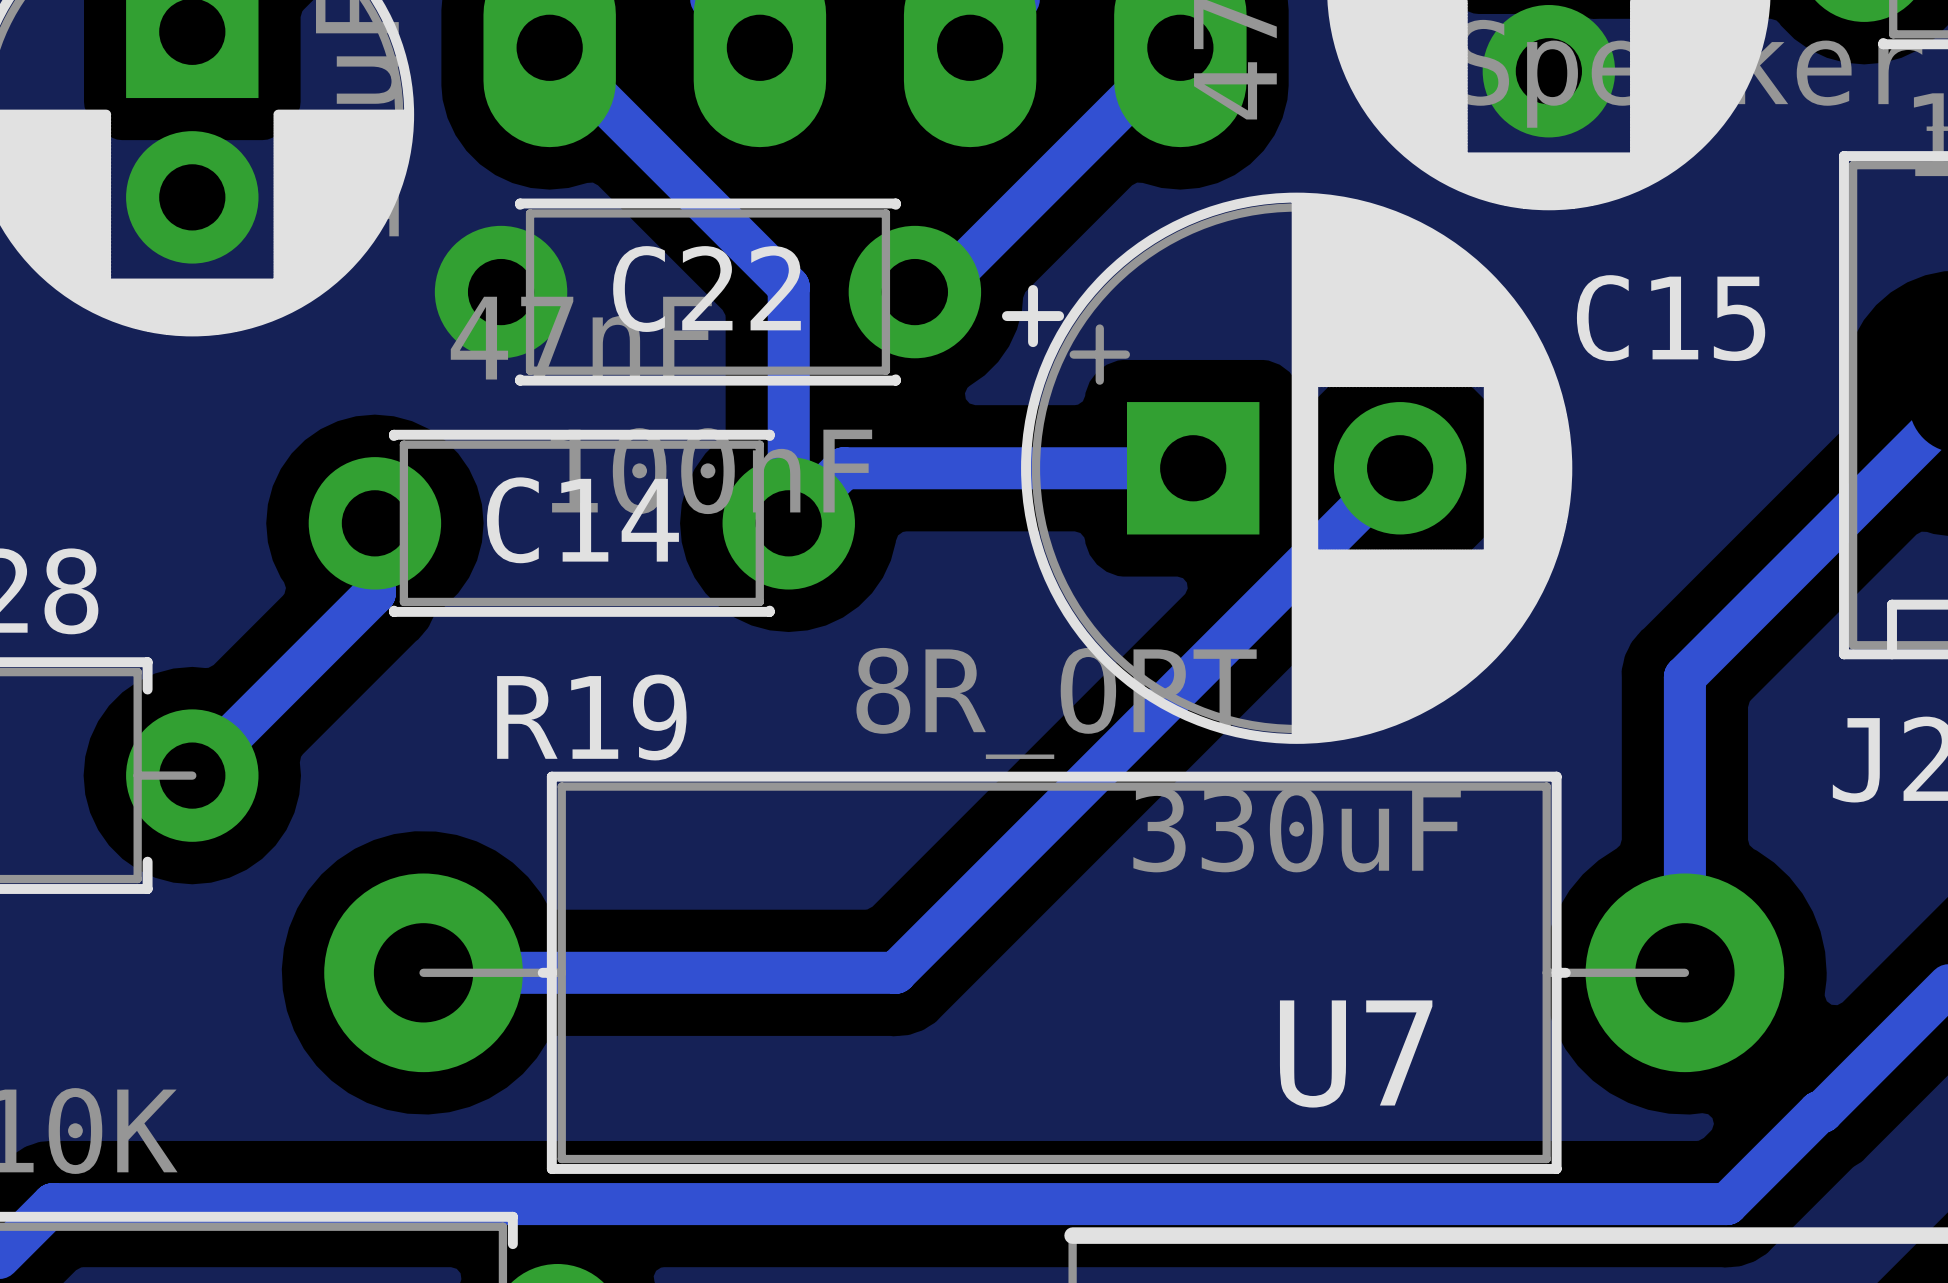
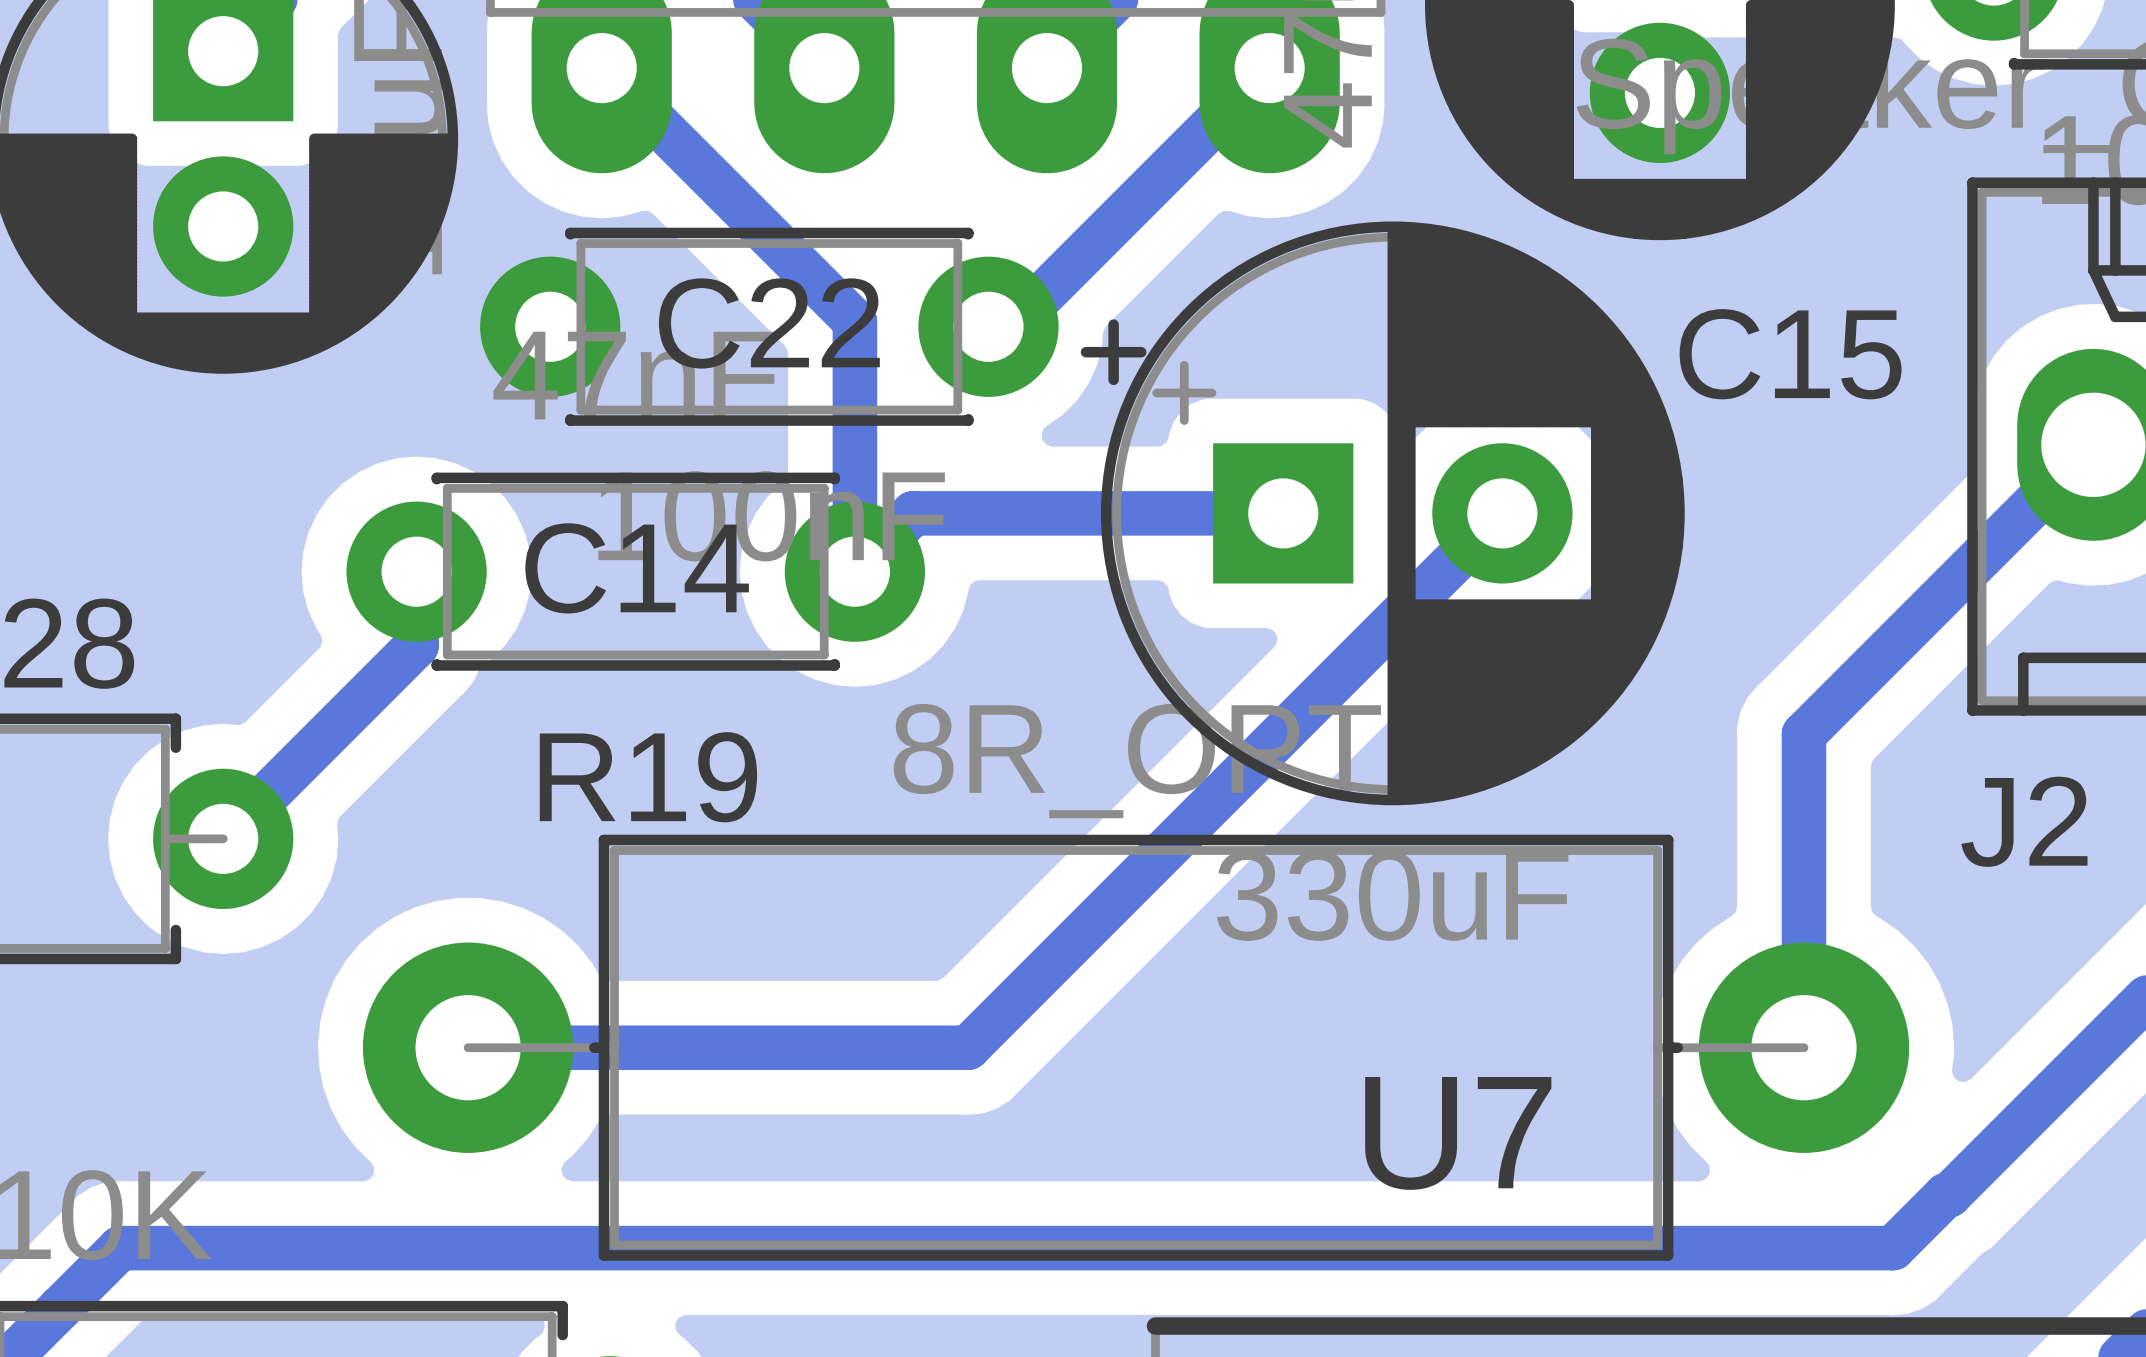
bottom track: (1769, 1162) (1726, 1204) (52, 1204) -> (1893, 1248) (120, 1248) (75, 1292)

